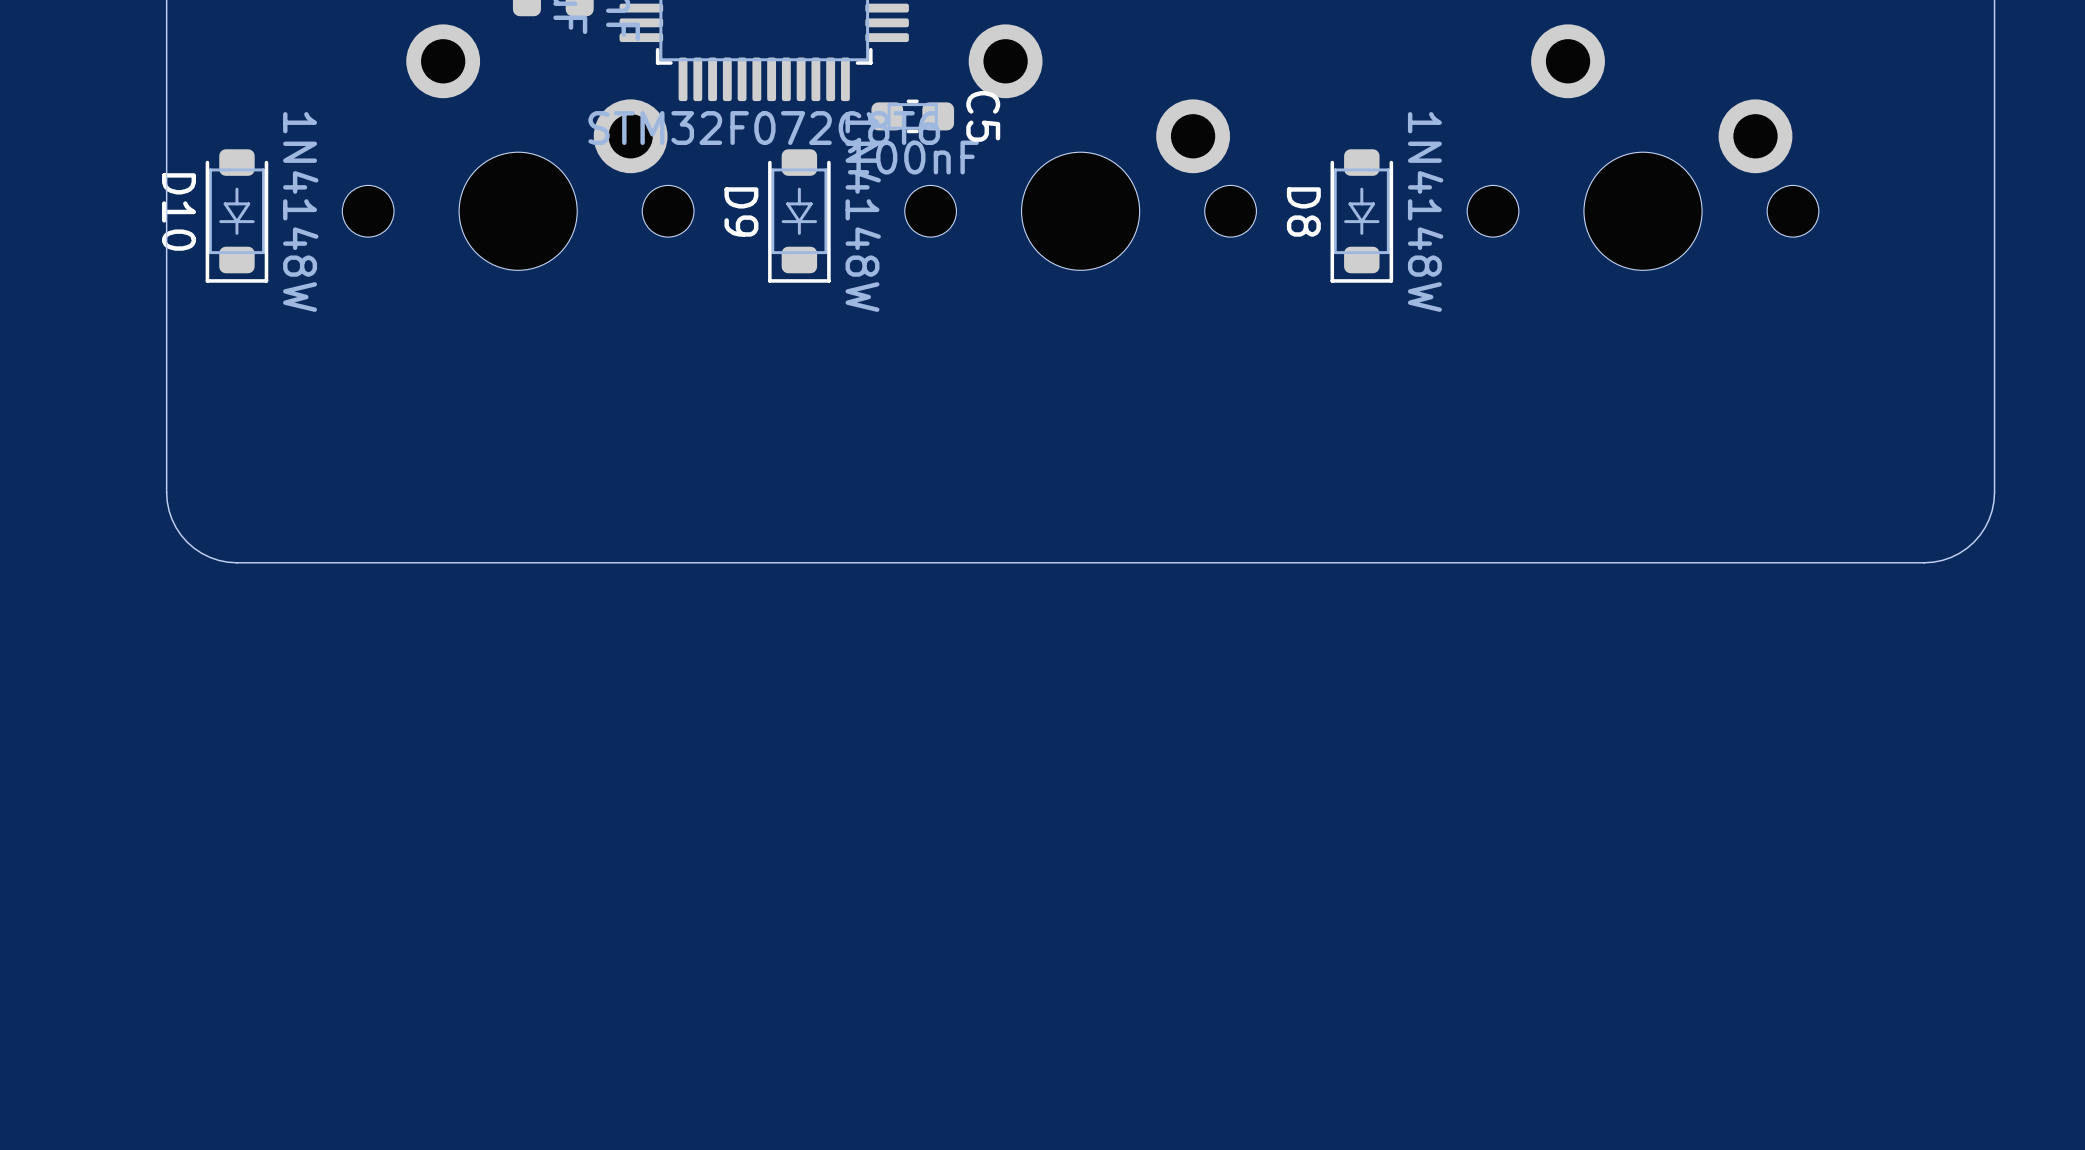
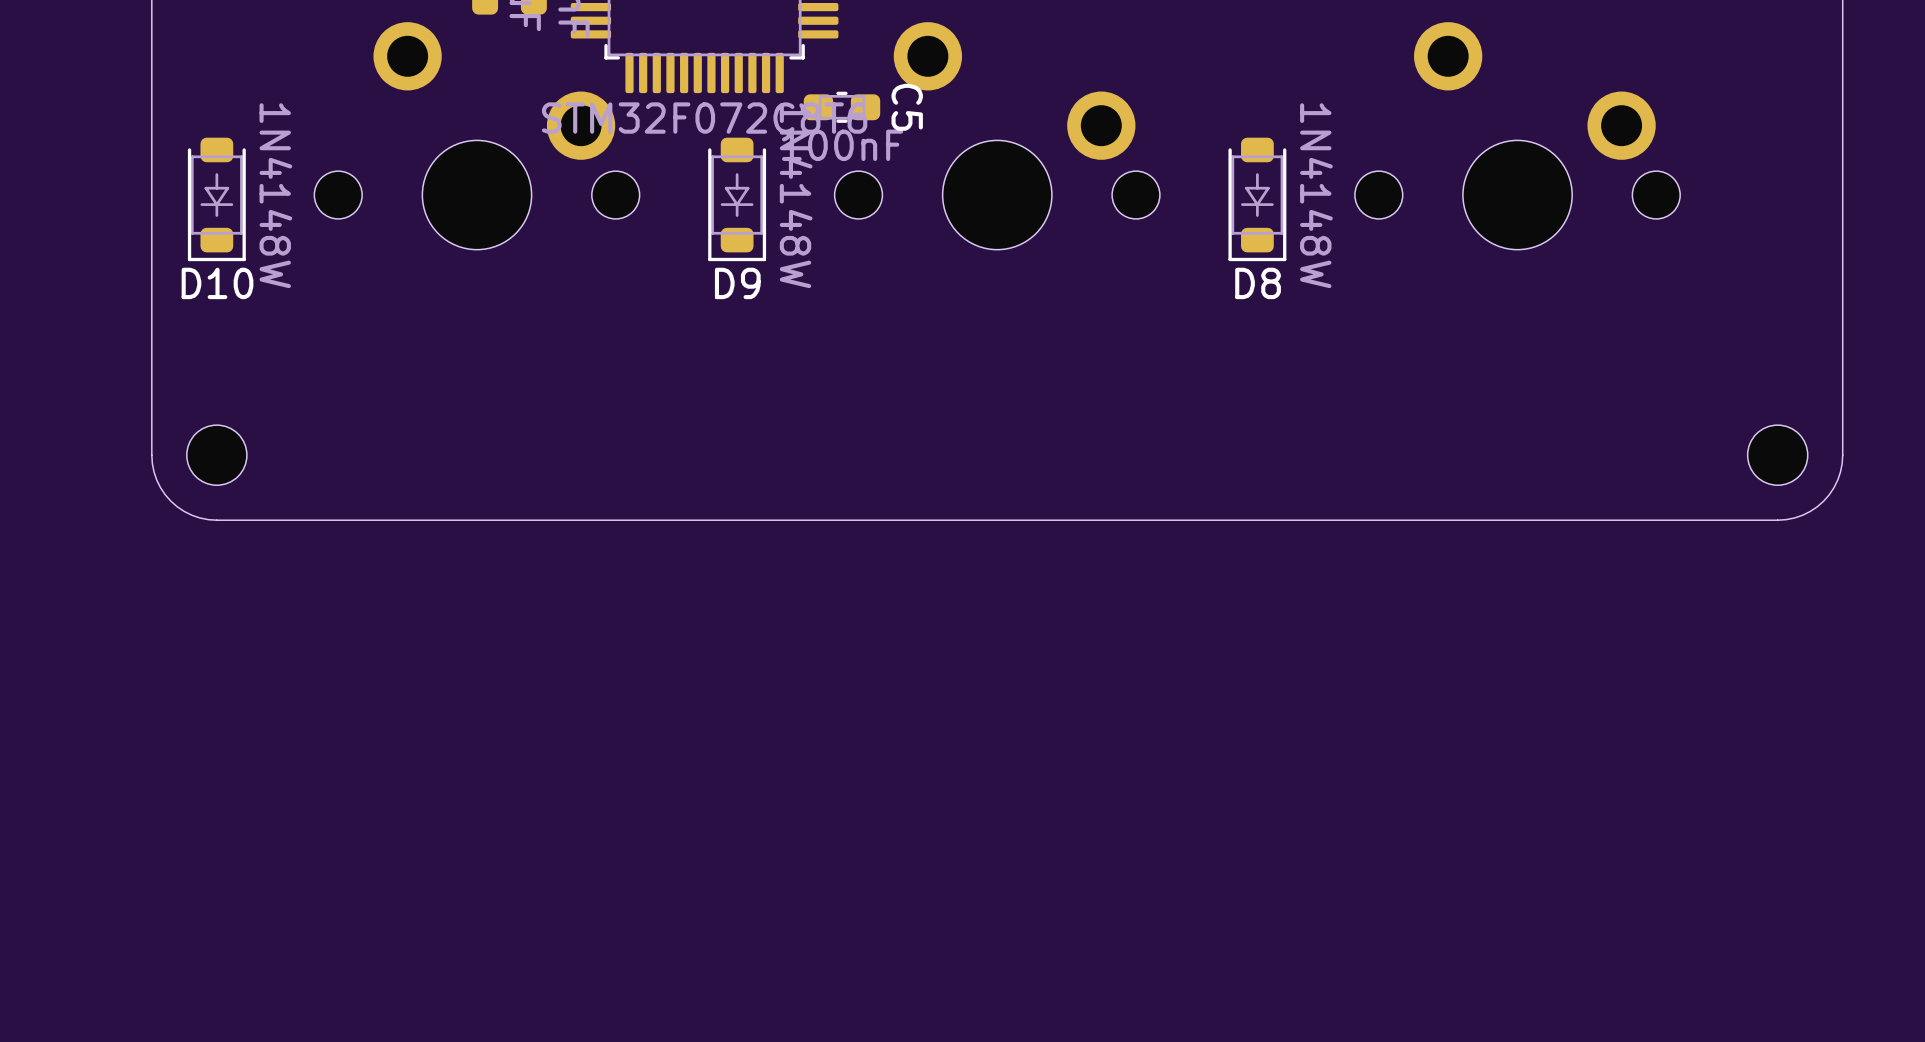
D10 name rotation: 0° (179, 211) -> 90° counterclockwise (217, 283)
D10 name position: D10 (179, 211) -> D10 (217, 283)
D9 name rotation: 0° (741, 211) -> 90° counterclockwise (737, 283)
D9 name position: D9 (741, 211) -> D9 (737, 283)
D8 name rotation: 0° (1303, 211) -> 90° counterclockwise (1258, 283)
D8 name position: D8 (1303, 211) -> D8 (1258, 283)
part: none -> (216, 455)
part: none -> (1777, 455)

